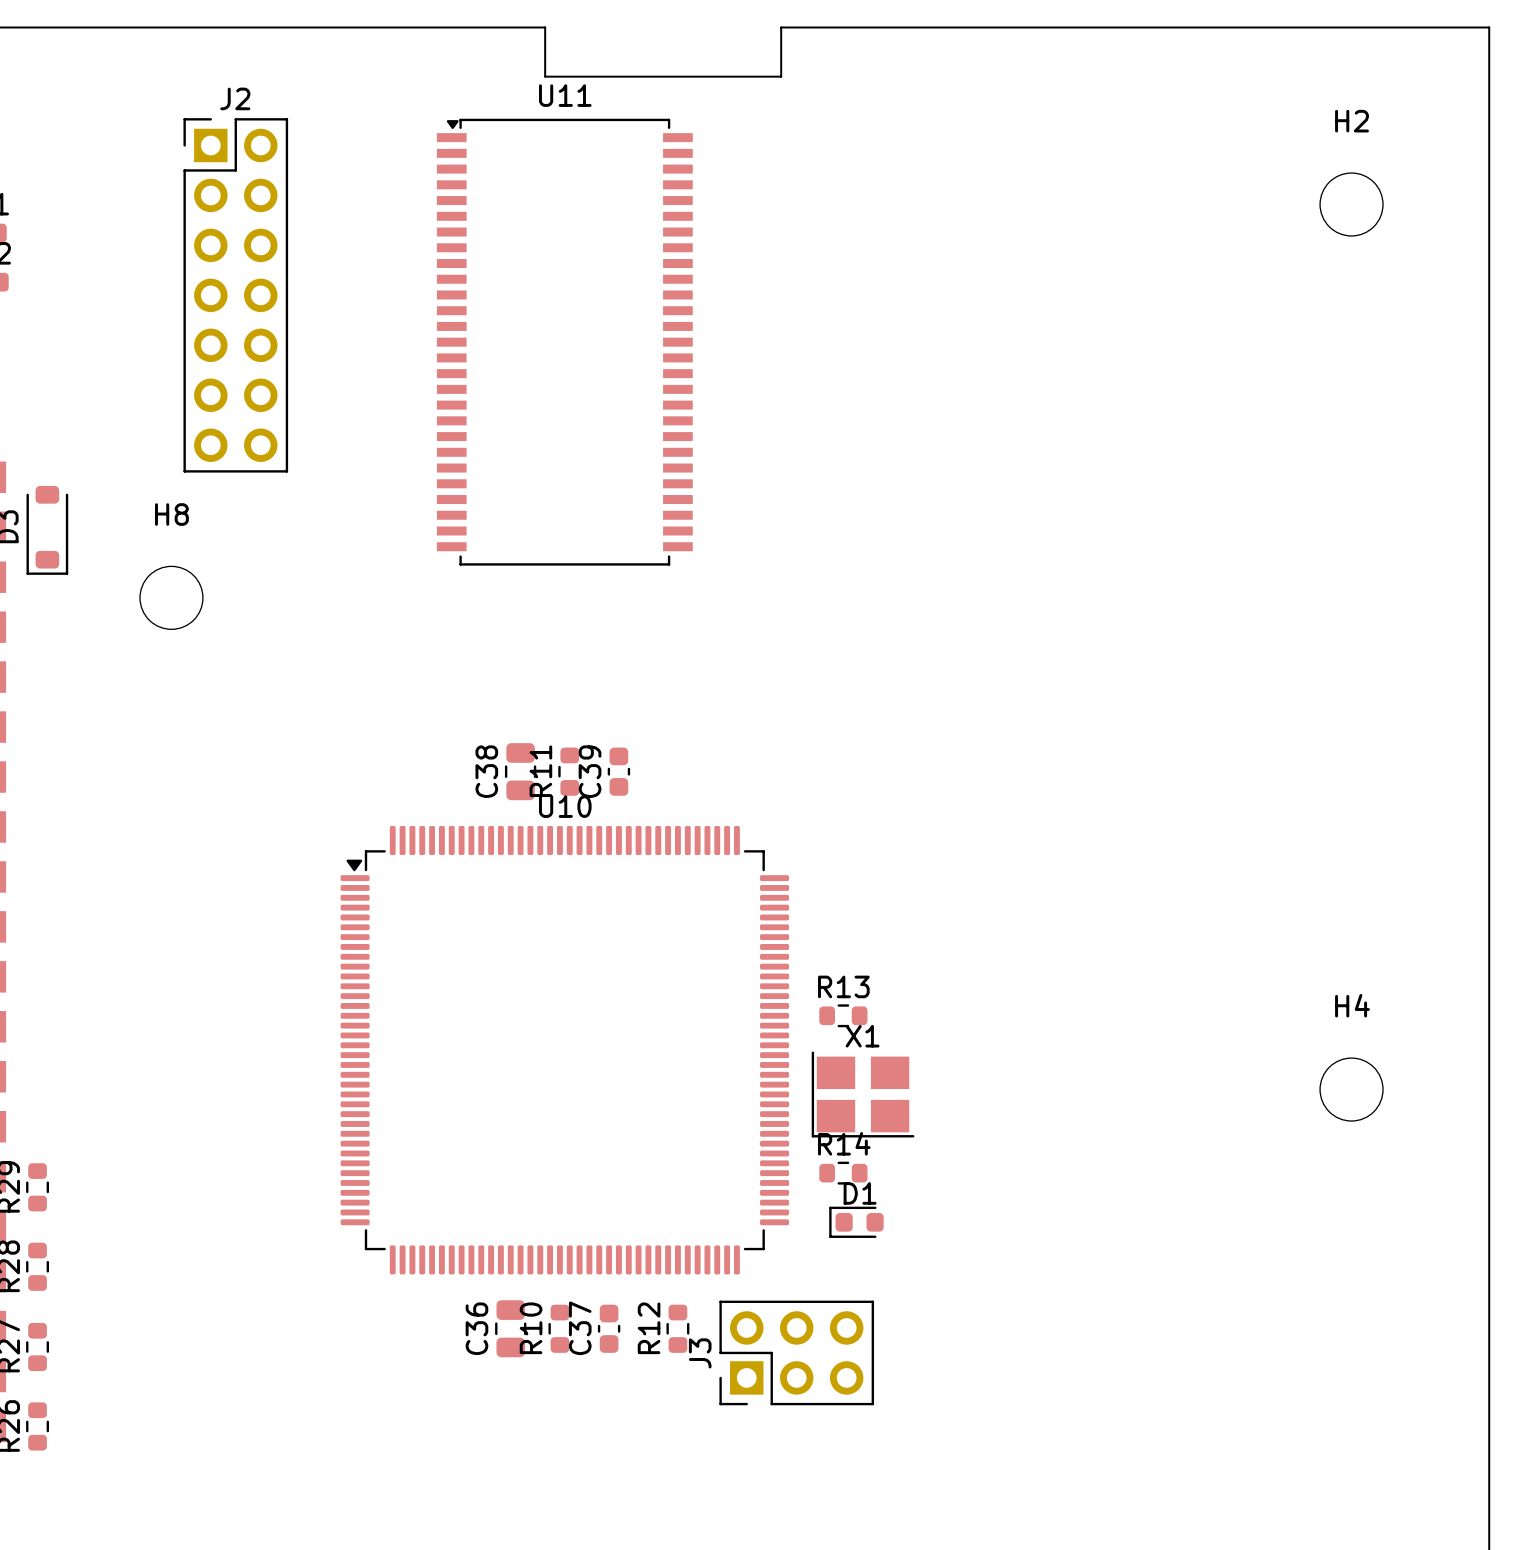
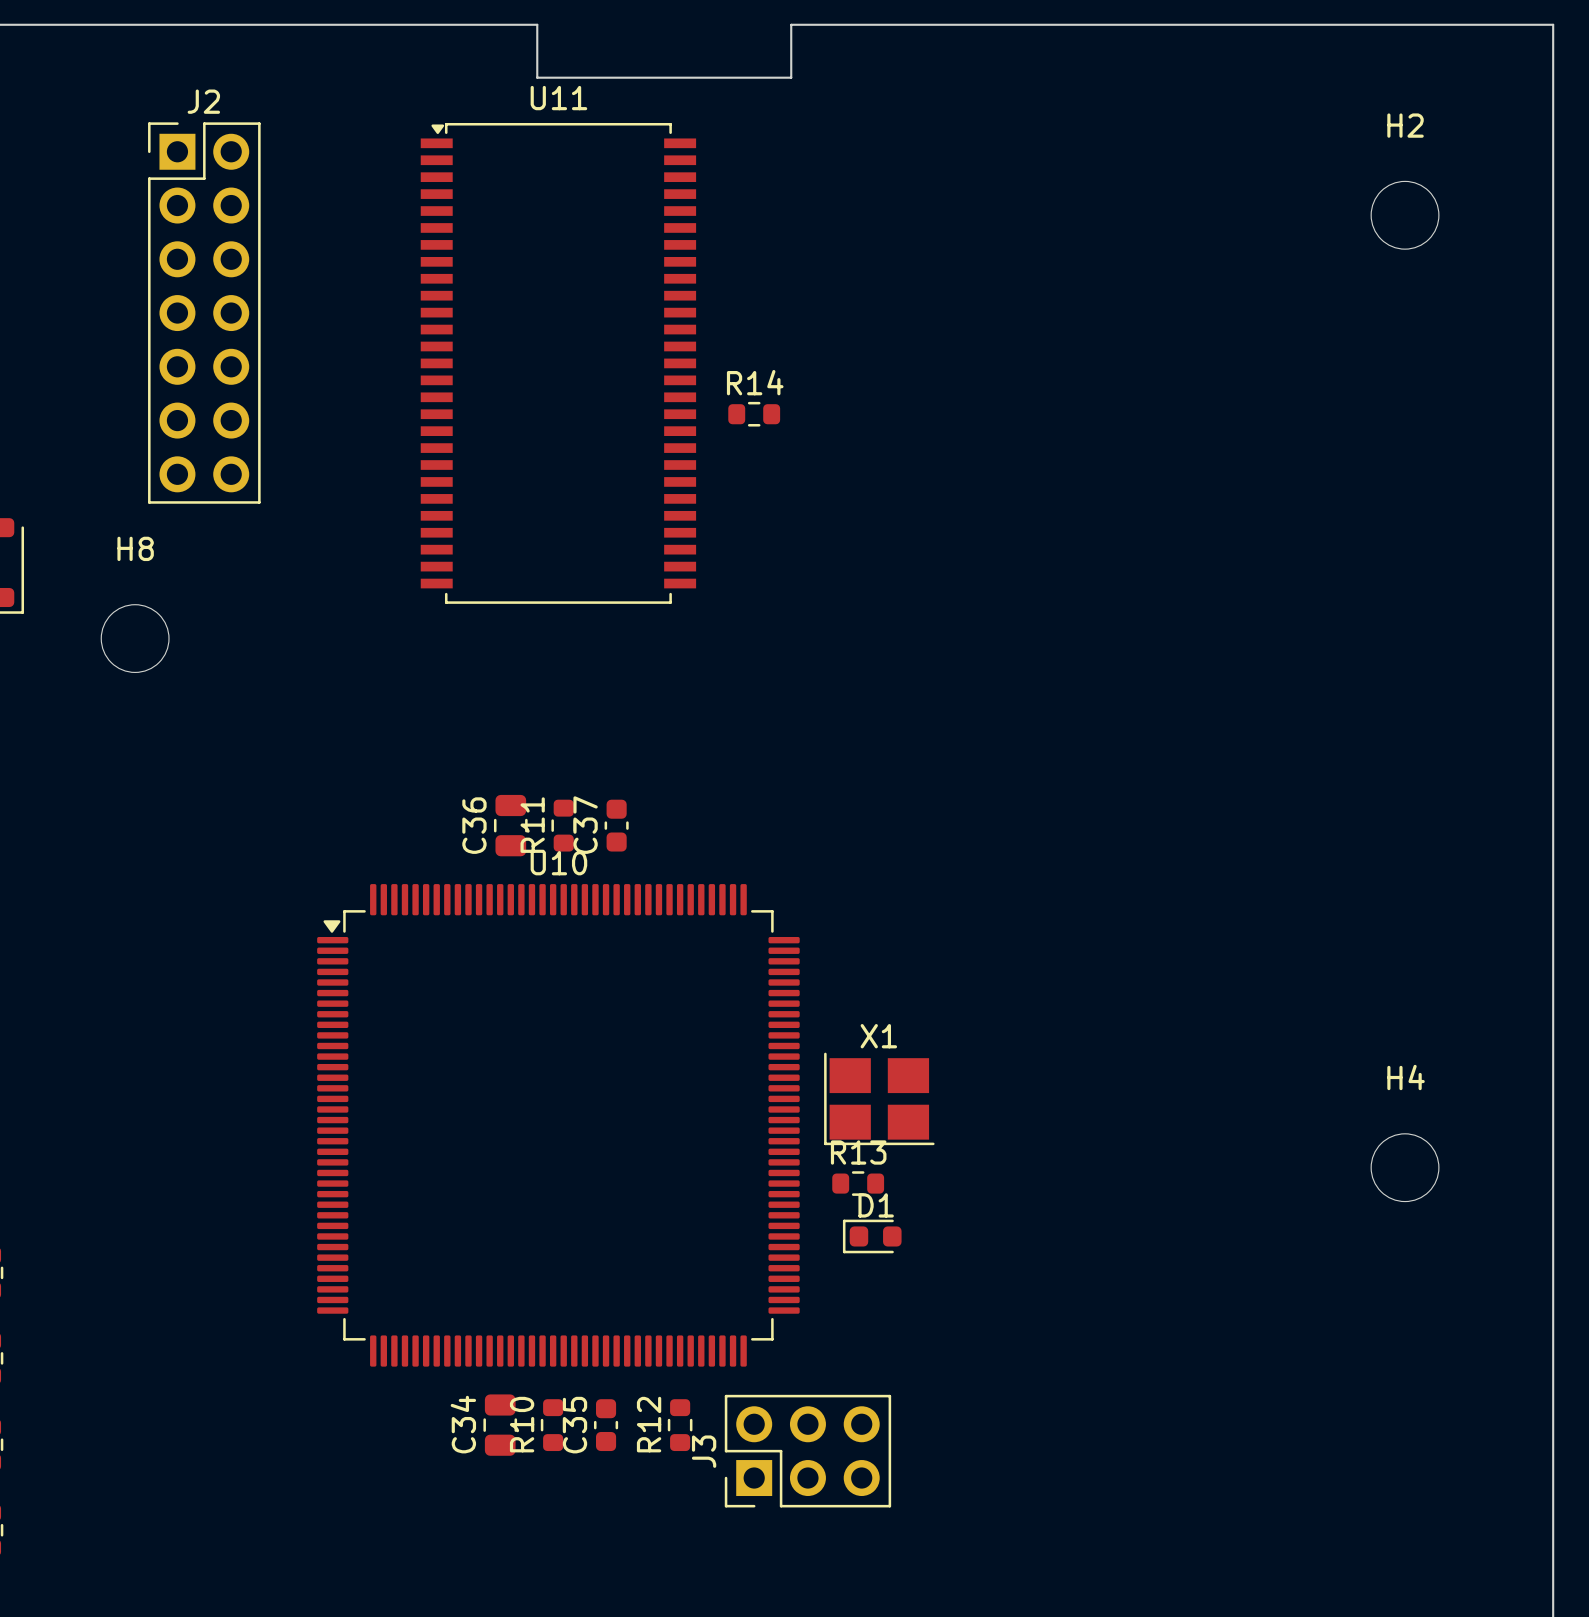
C38 name: C38 (486, 771) -> C36 (474, 825)
C39 name: C39 (590, 771) -> C37 (585, 825)
R13 position: (843, 1015) -> (858, 1183)
X1 position: (863, 1094) -> (879, 1098)
R14 position: (843, 1173) -> (754, 414)
D1 position: (856, 1222) -> (872, 1236)
C36 name: C36 (476, 1328) -> C34 (463, 1424)
C37 name: C37 (580, 1328) -> C35 (574, 1425)

